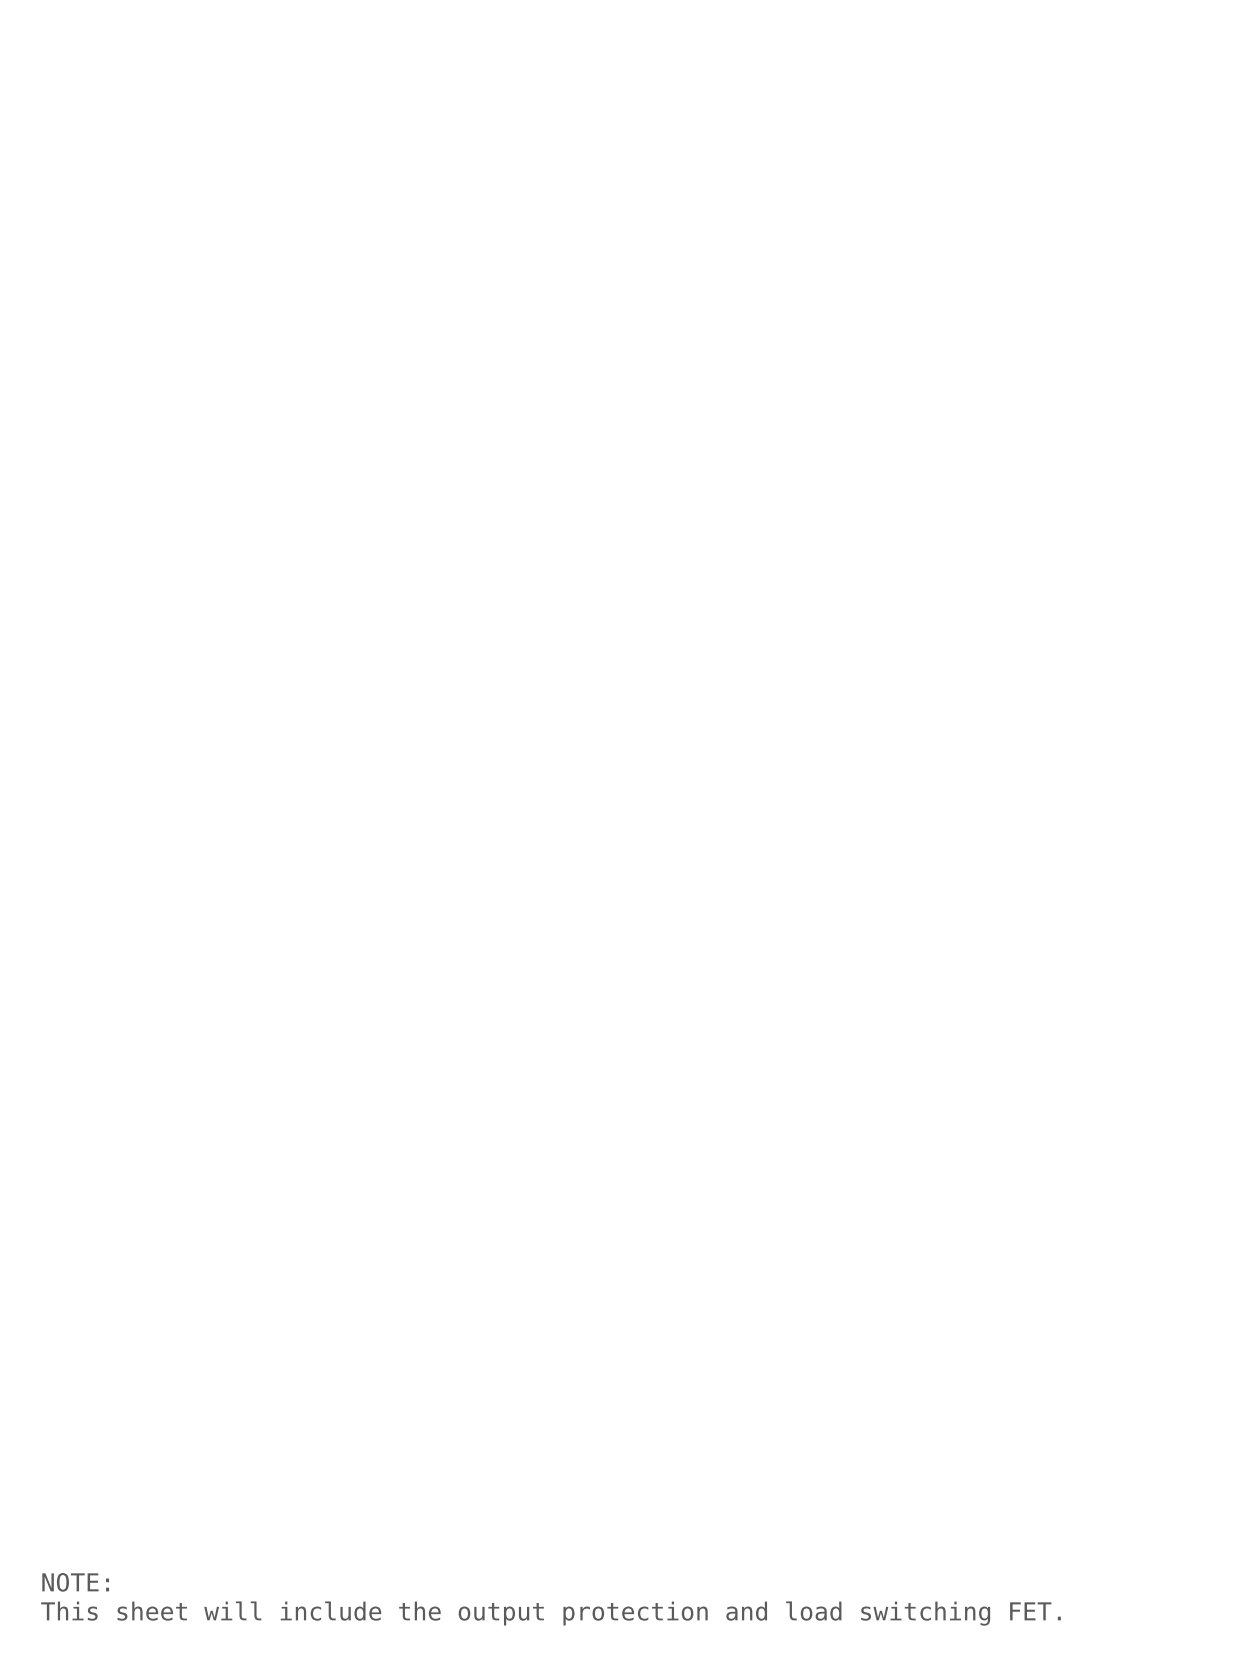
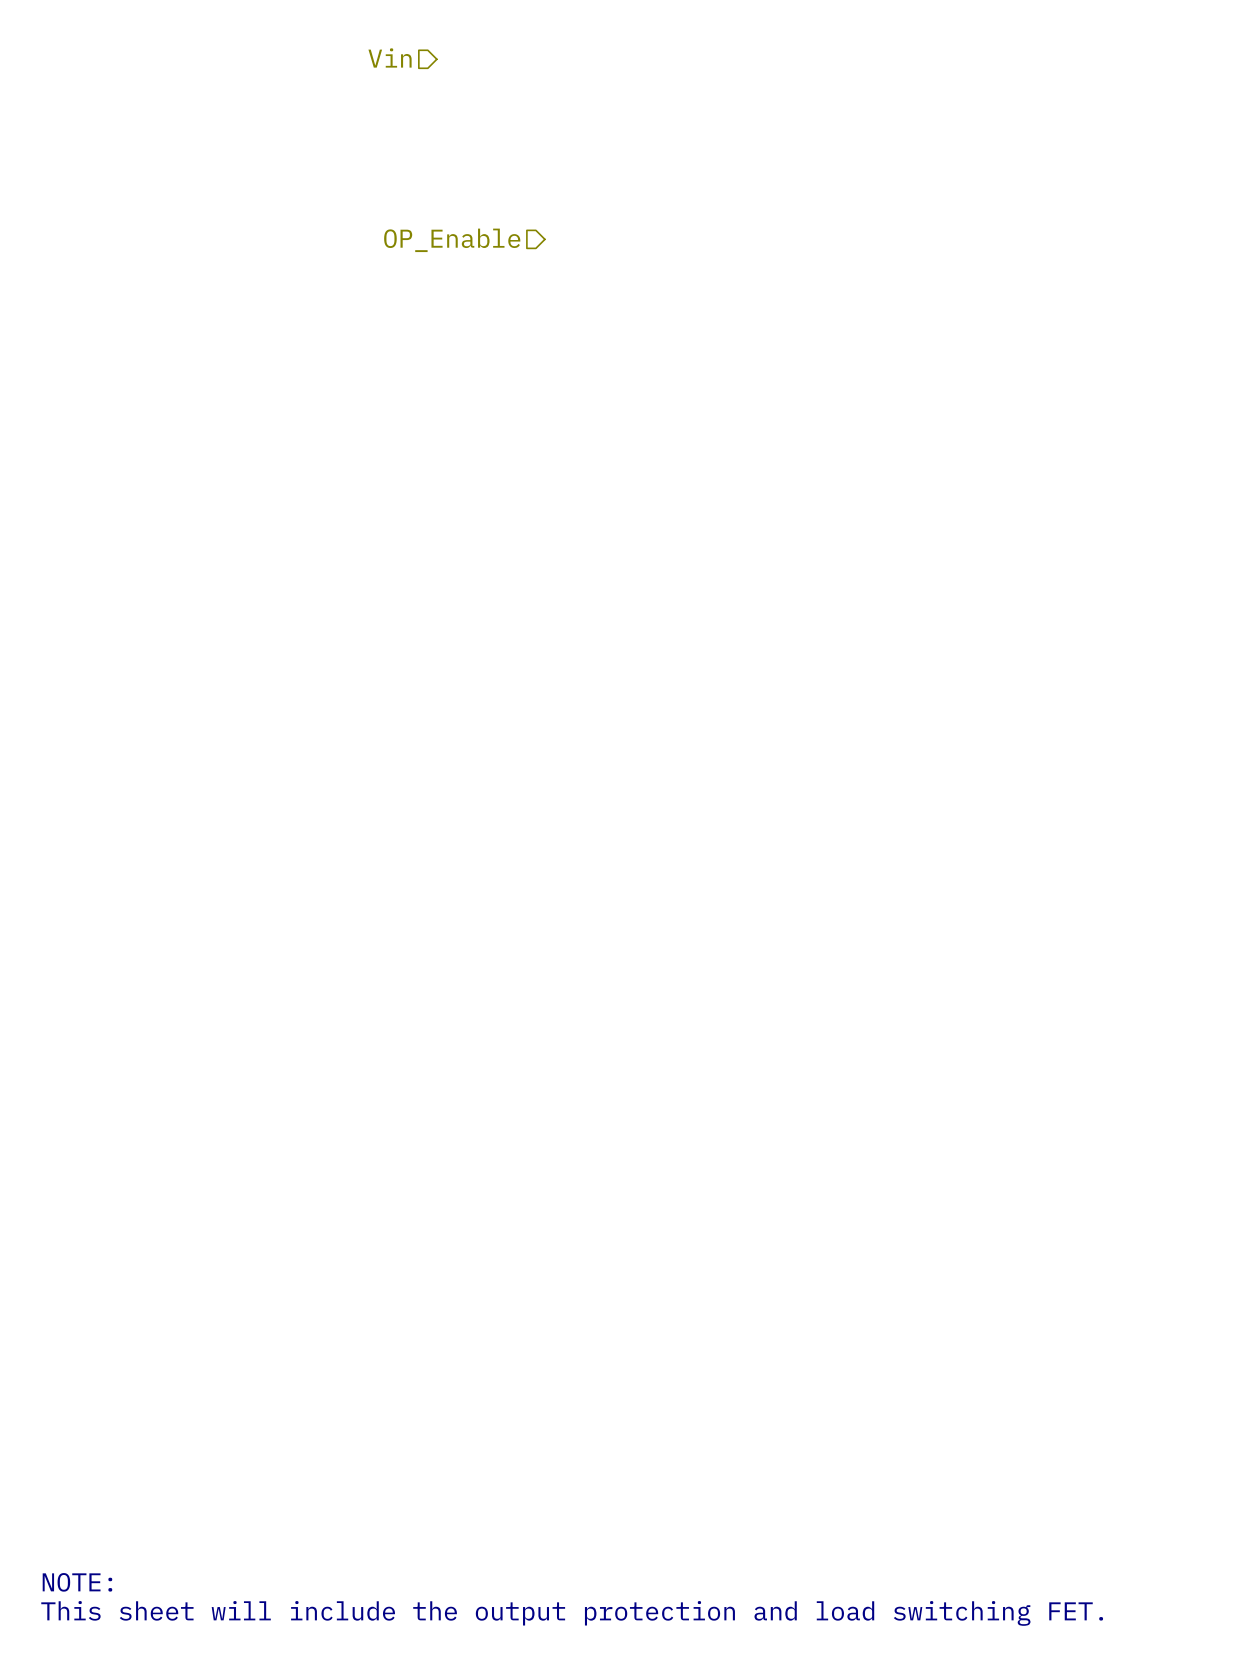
hierarchical label: none -> Vin (390, 57)
hierarchical label: none -> OP_Enable (452, 240)

